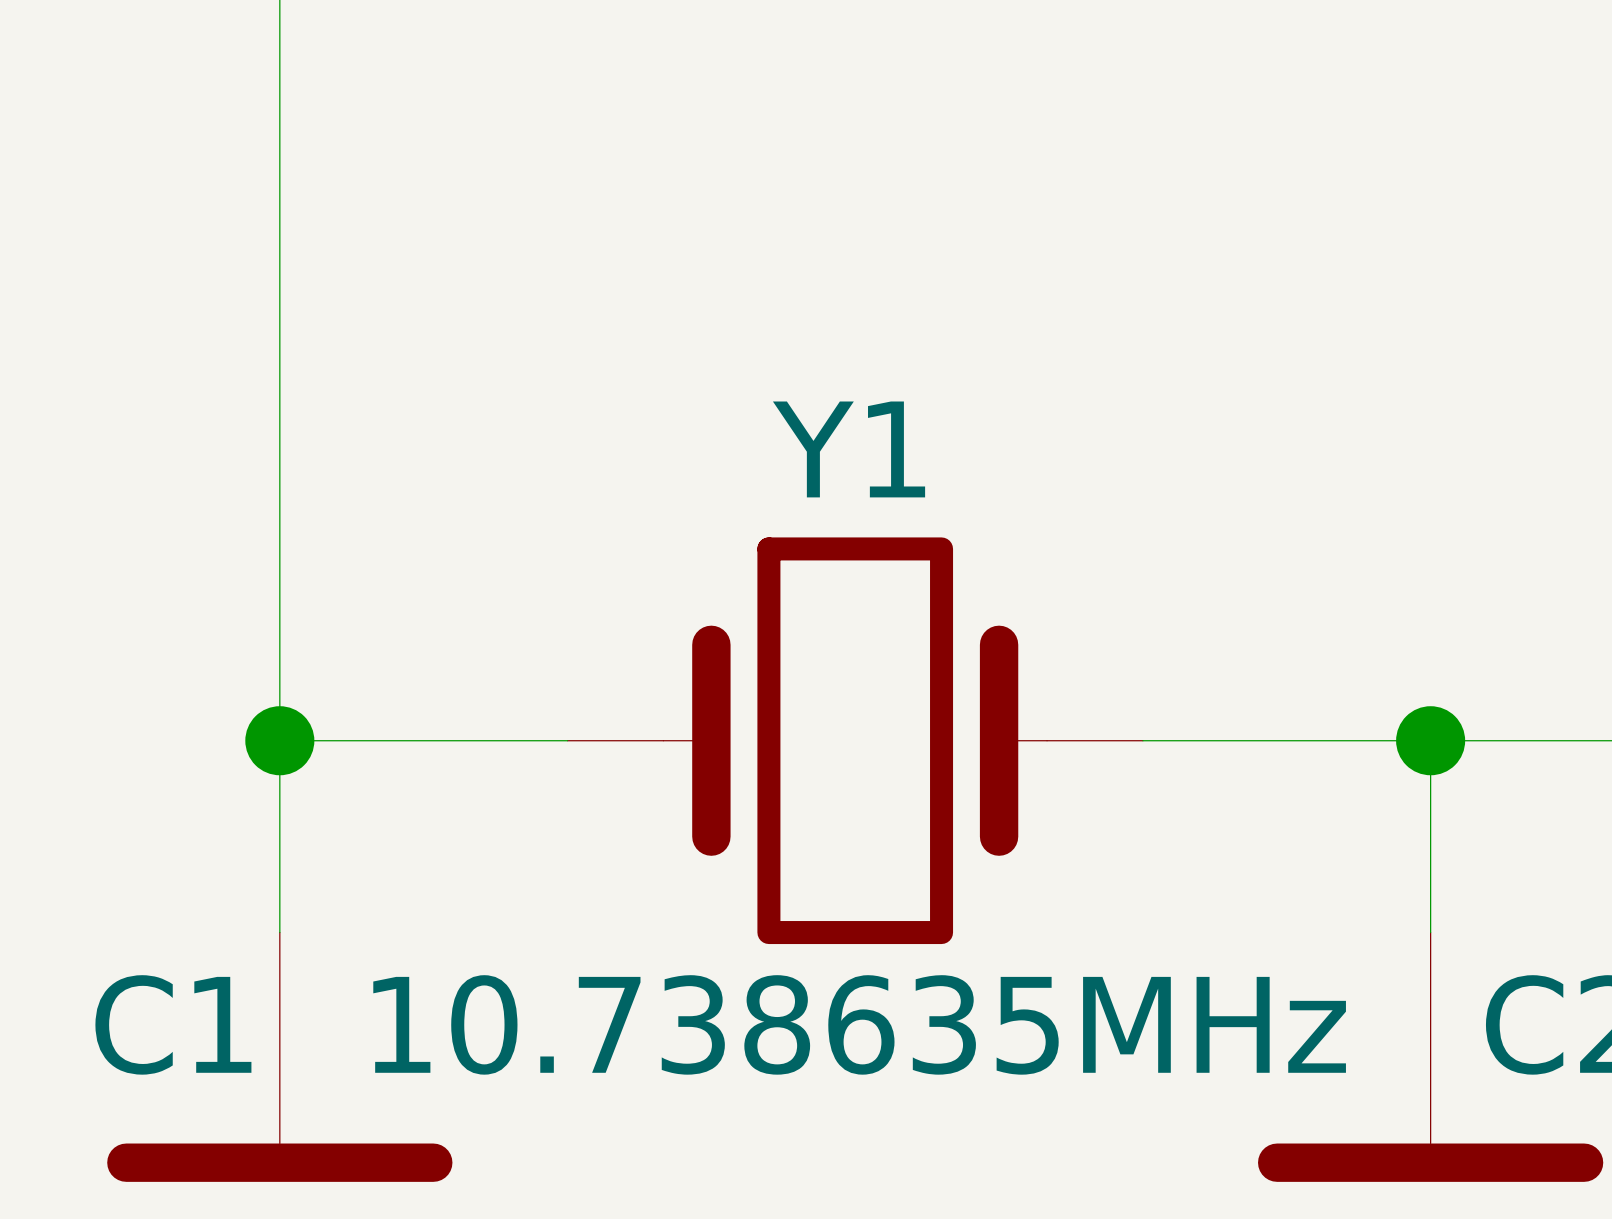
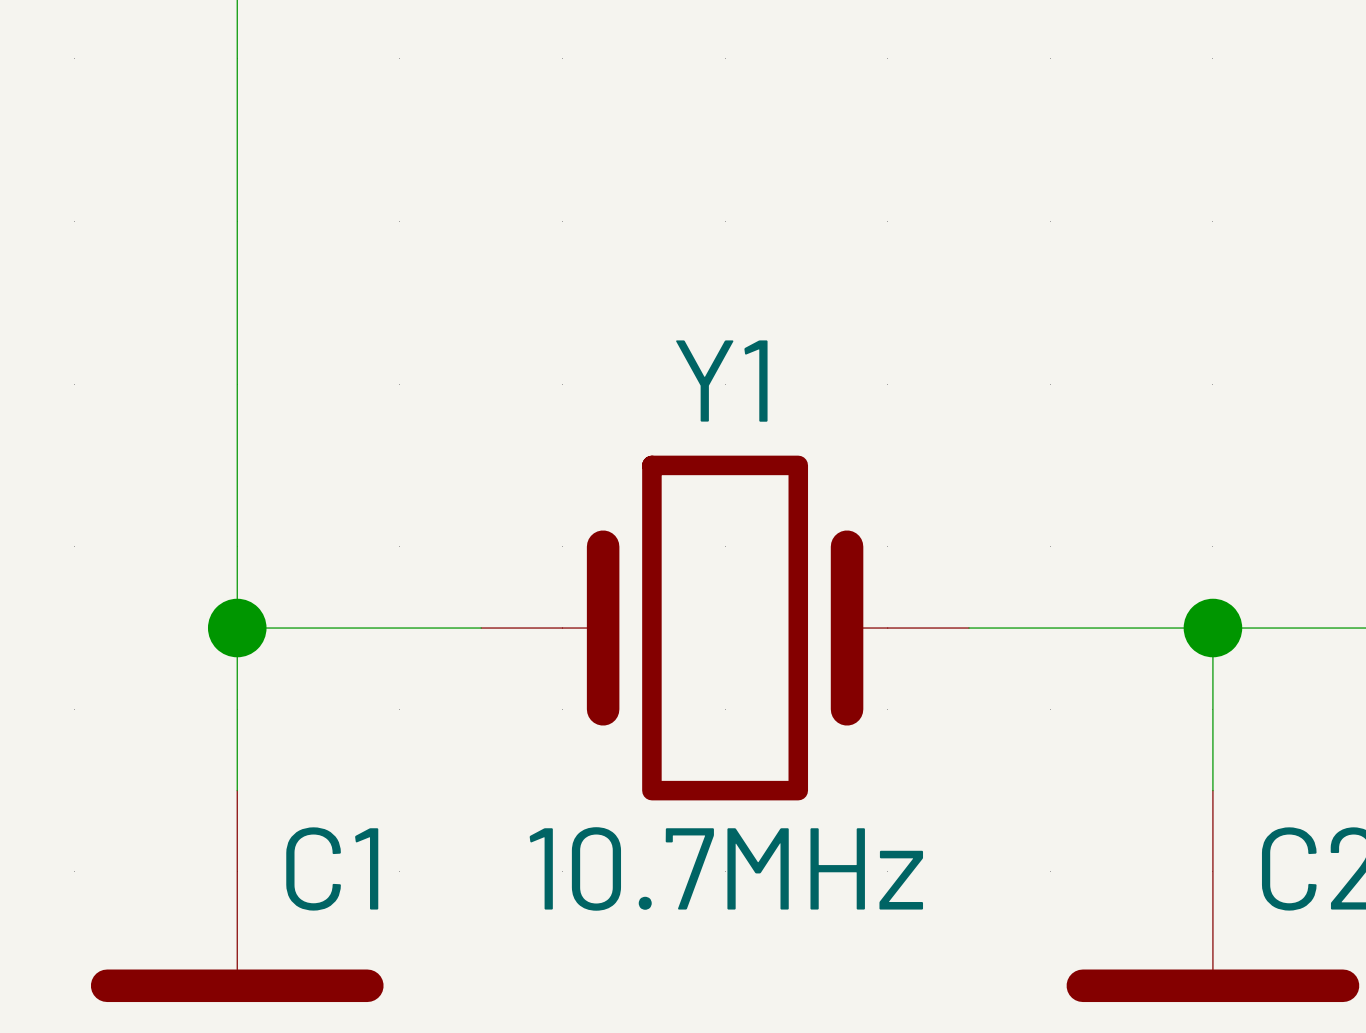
C1 name position: C1 (173, 1024) -> C1 (332, 868)
Y1 value: 10.738635MHz (859, 1024) -> 10.7MHz (726, 868)

